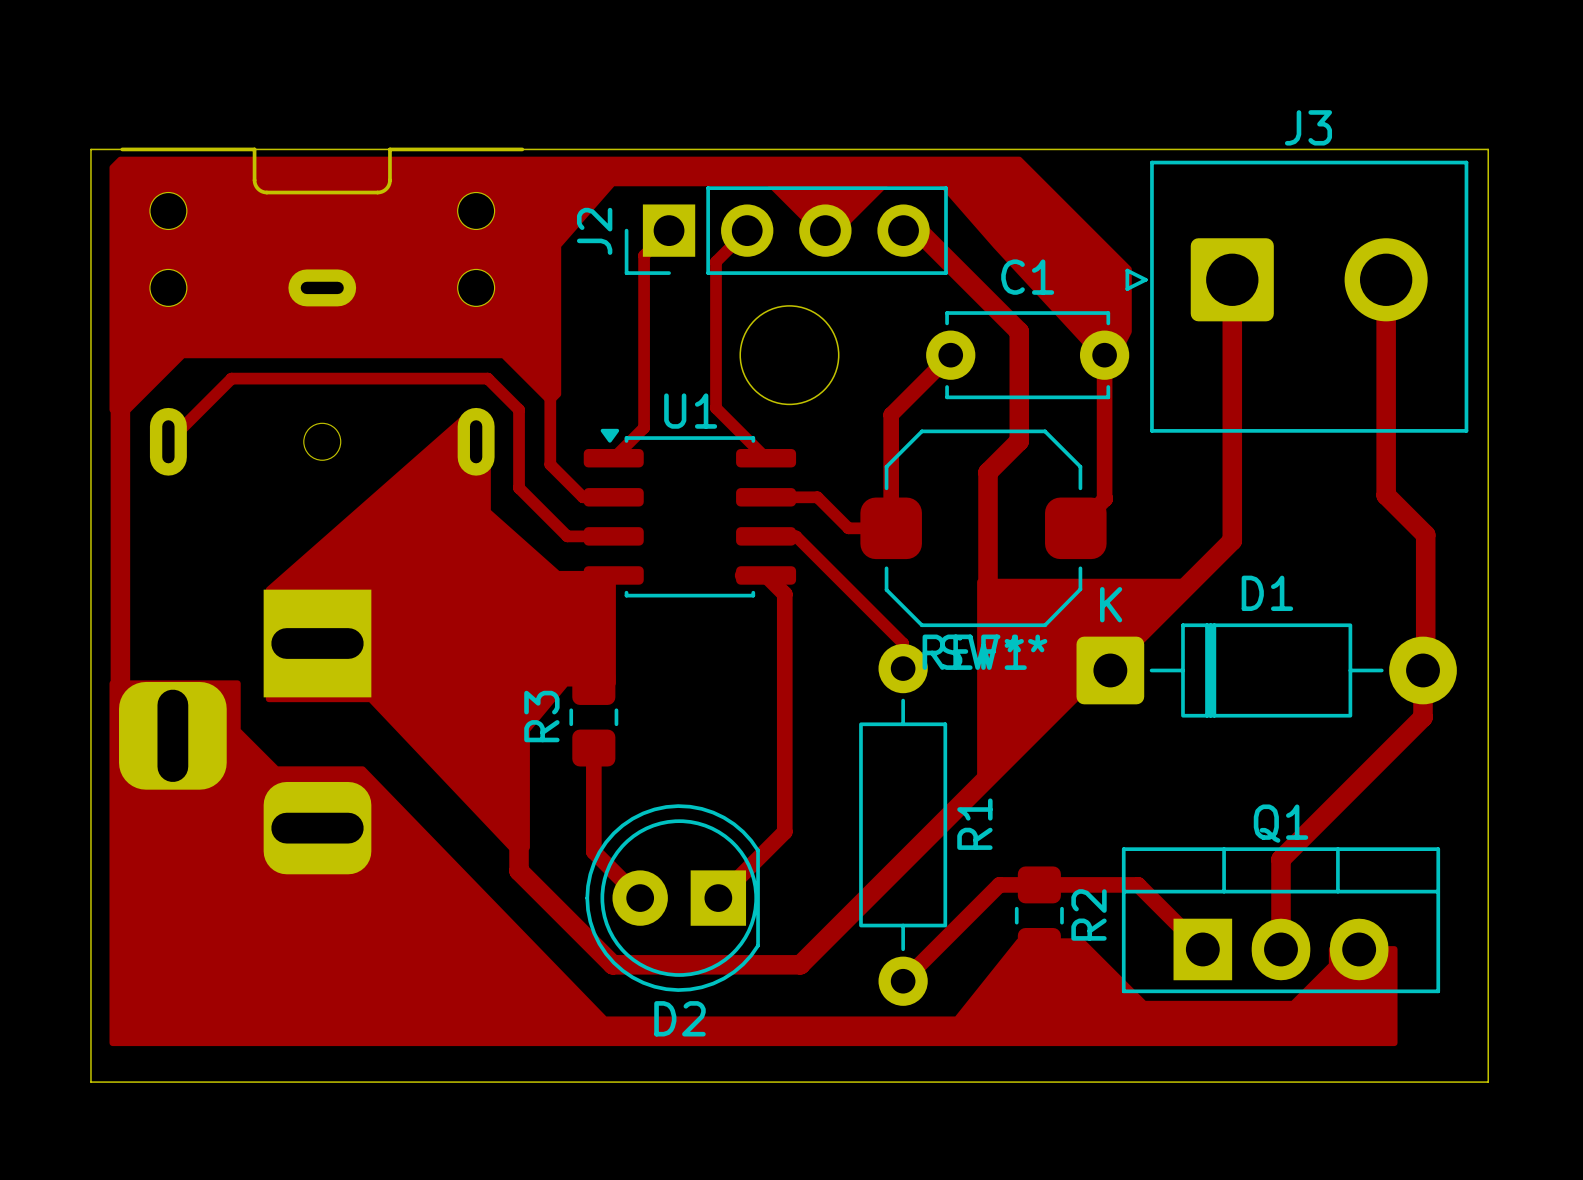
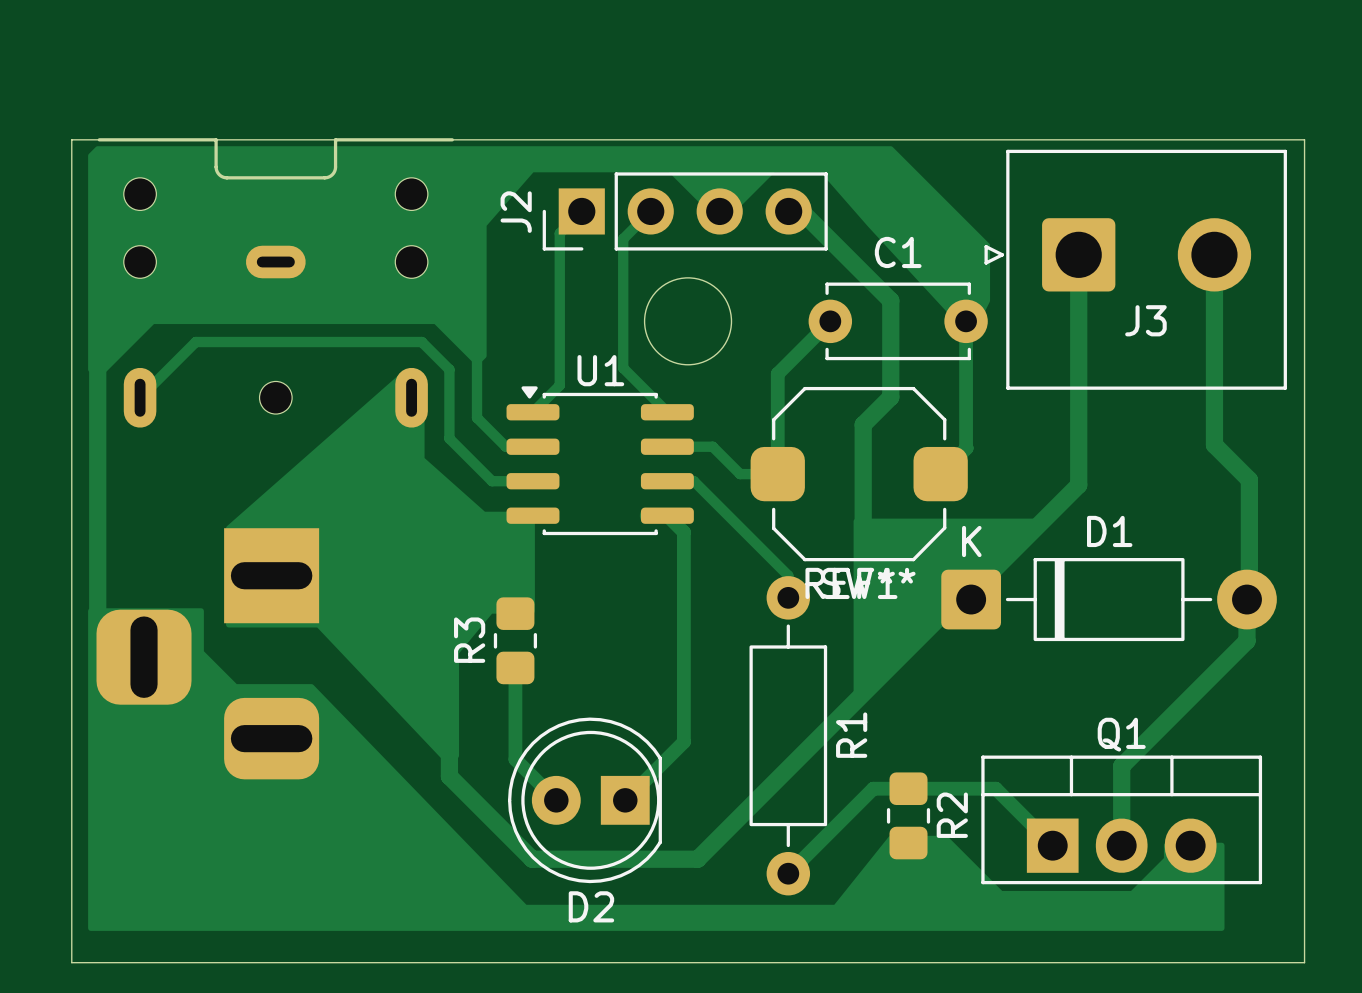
J3 name position: J3 (1308, 127) -> J3 (1145, 320)

